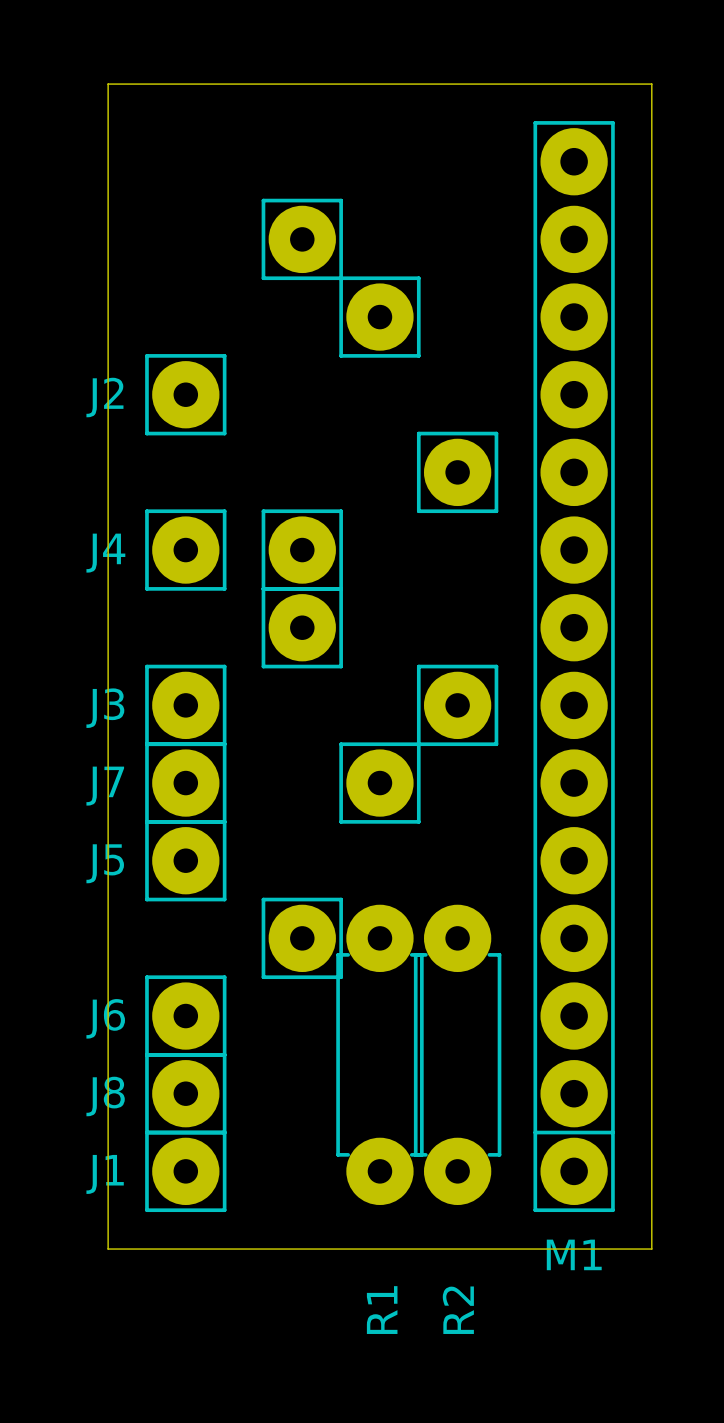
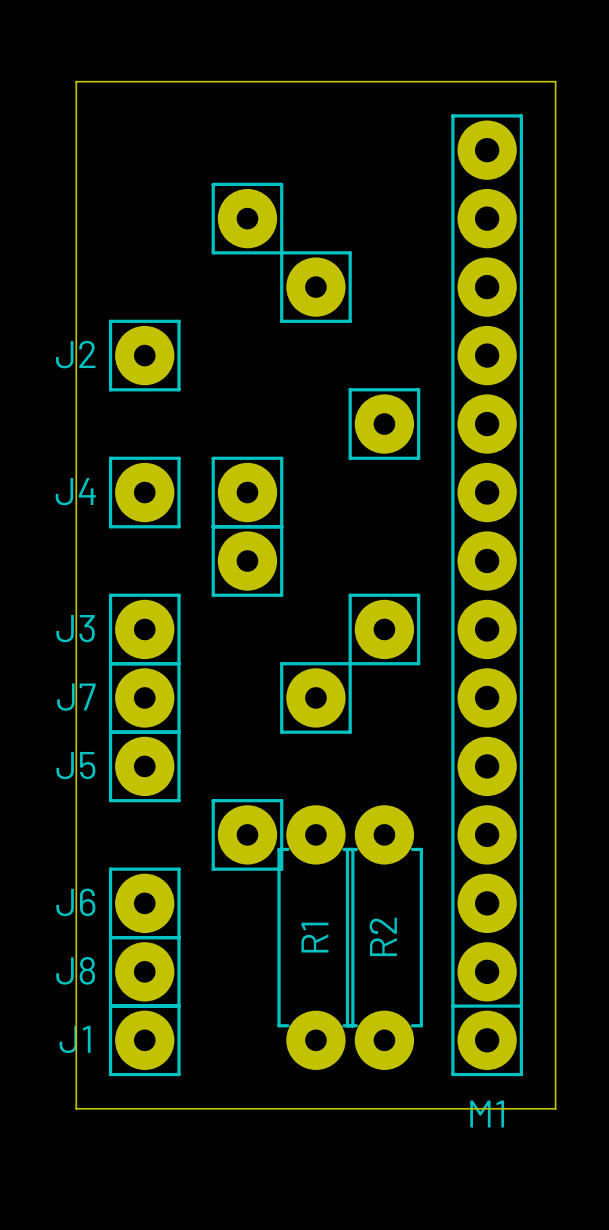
R1 name position: R1 (382, 1310) -> R1 (314, 937)
R2 name position: R2 (458, 1310) -> R2 (383, 936)

